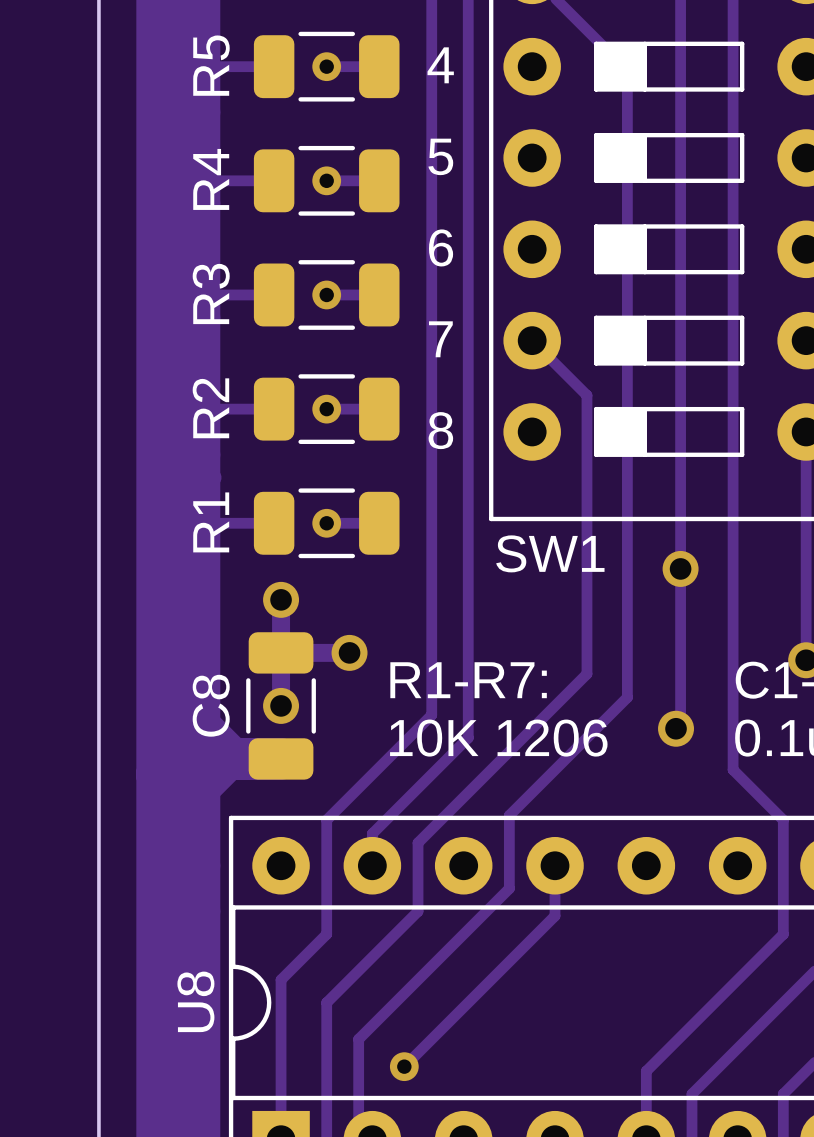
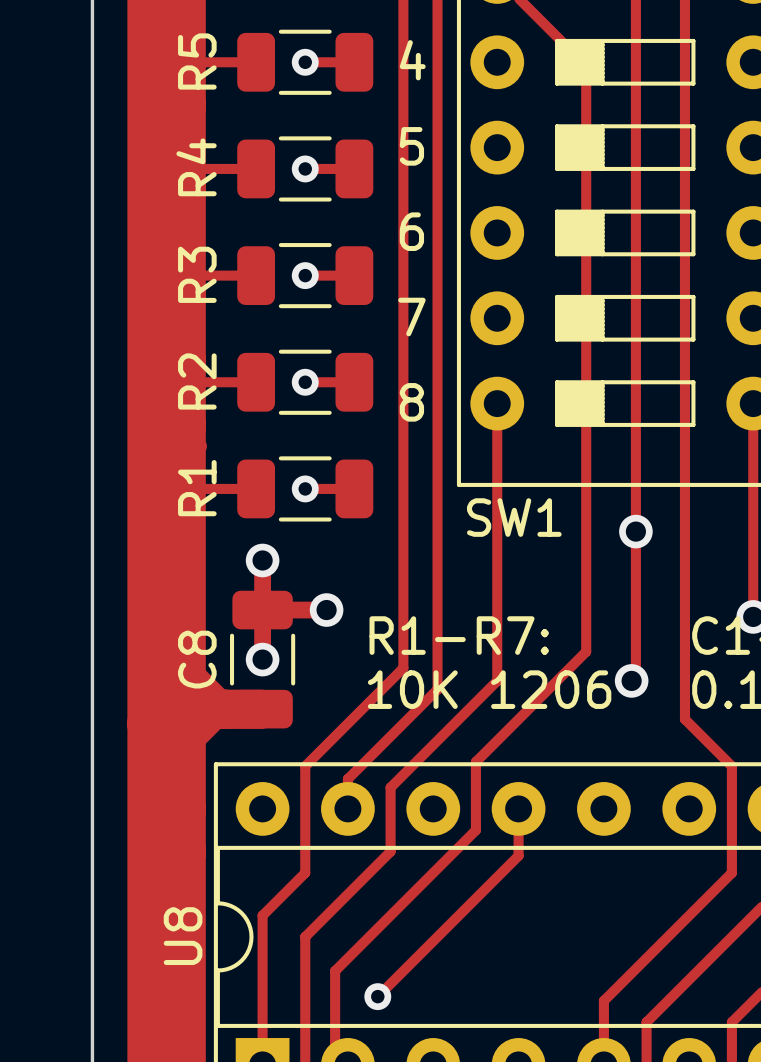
track: (532, 340) (586, 395) (586, 673) (532, 728) -> (497, 403) (497, 680)

